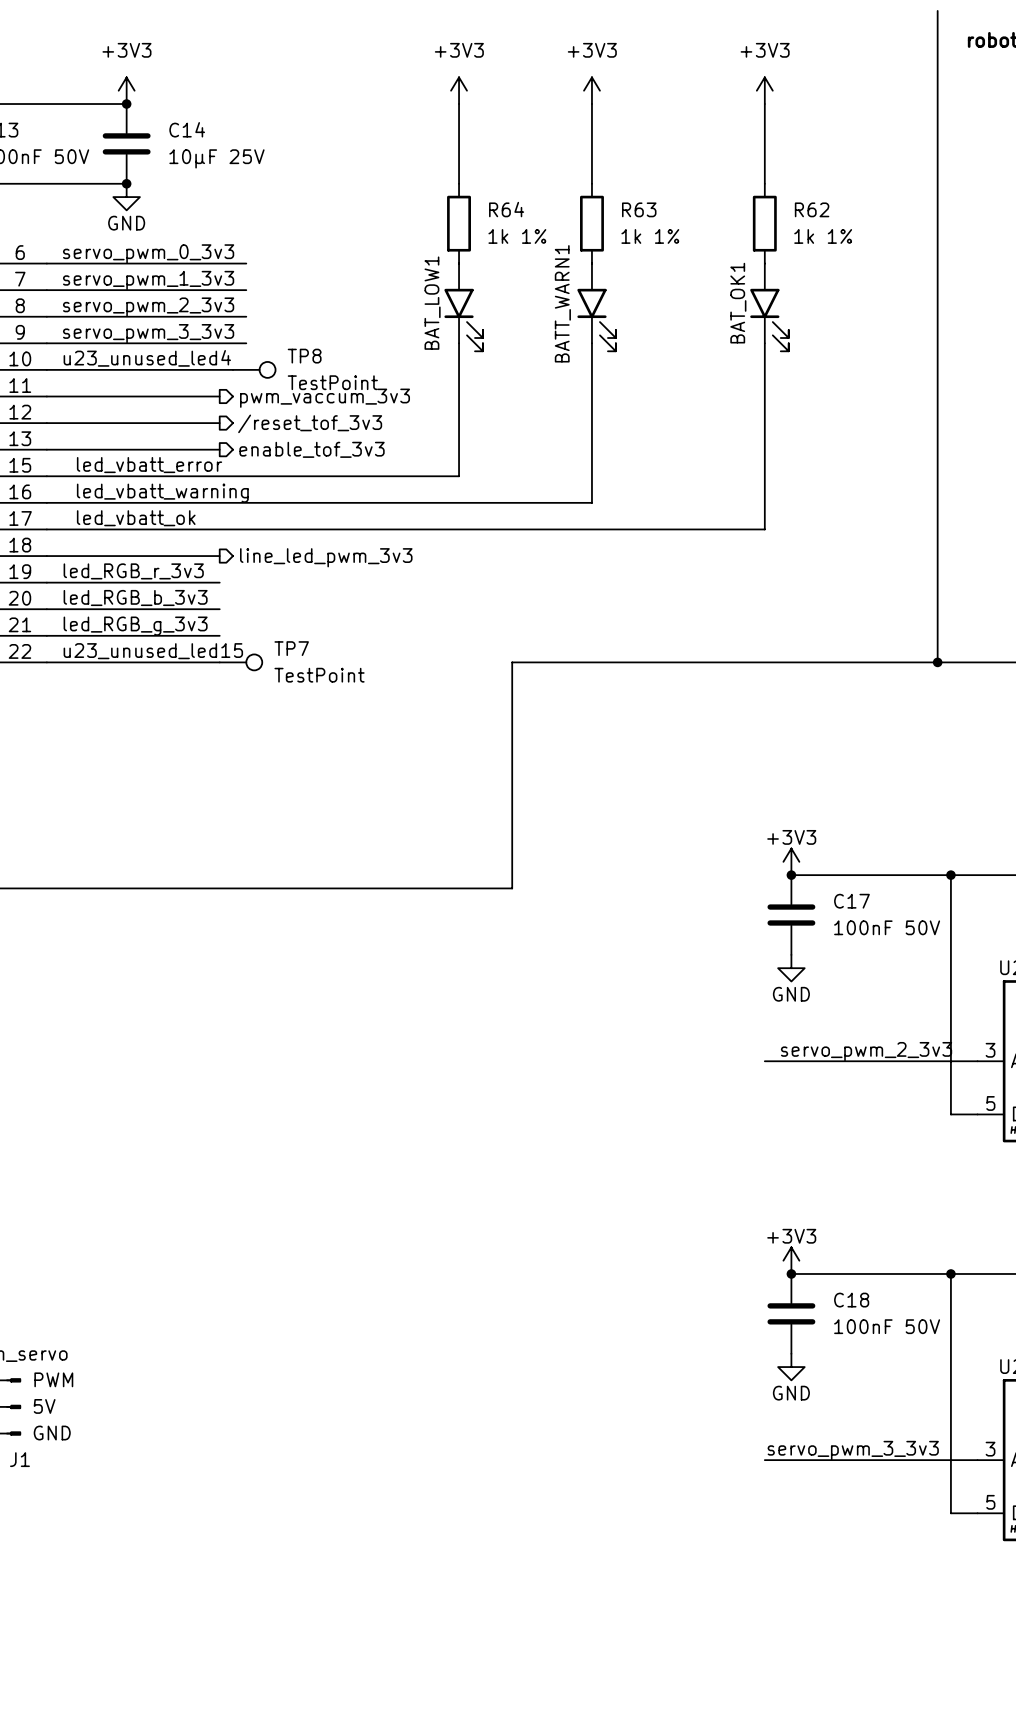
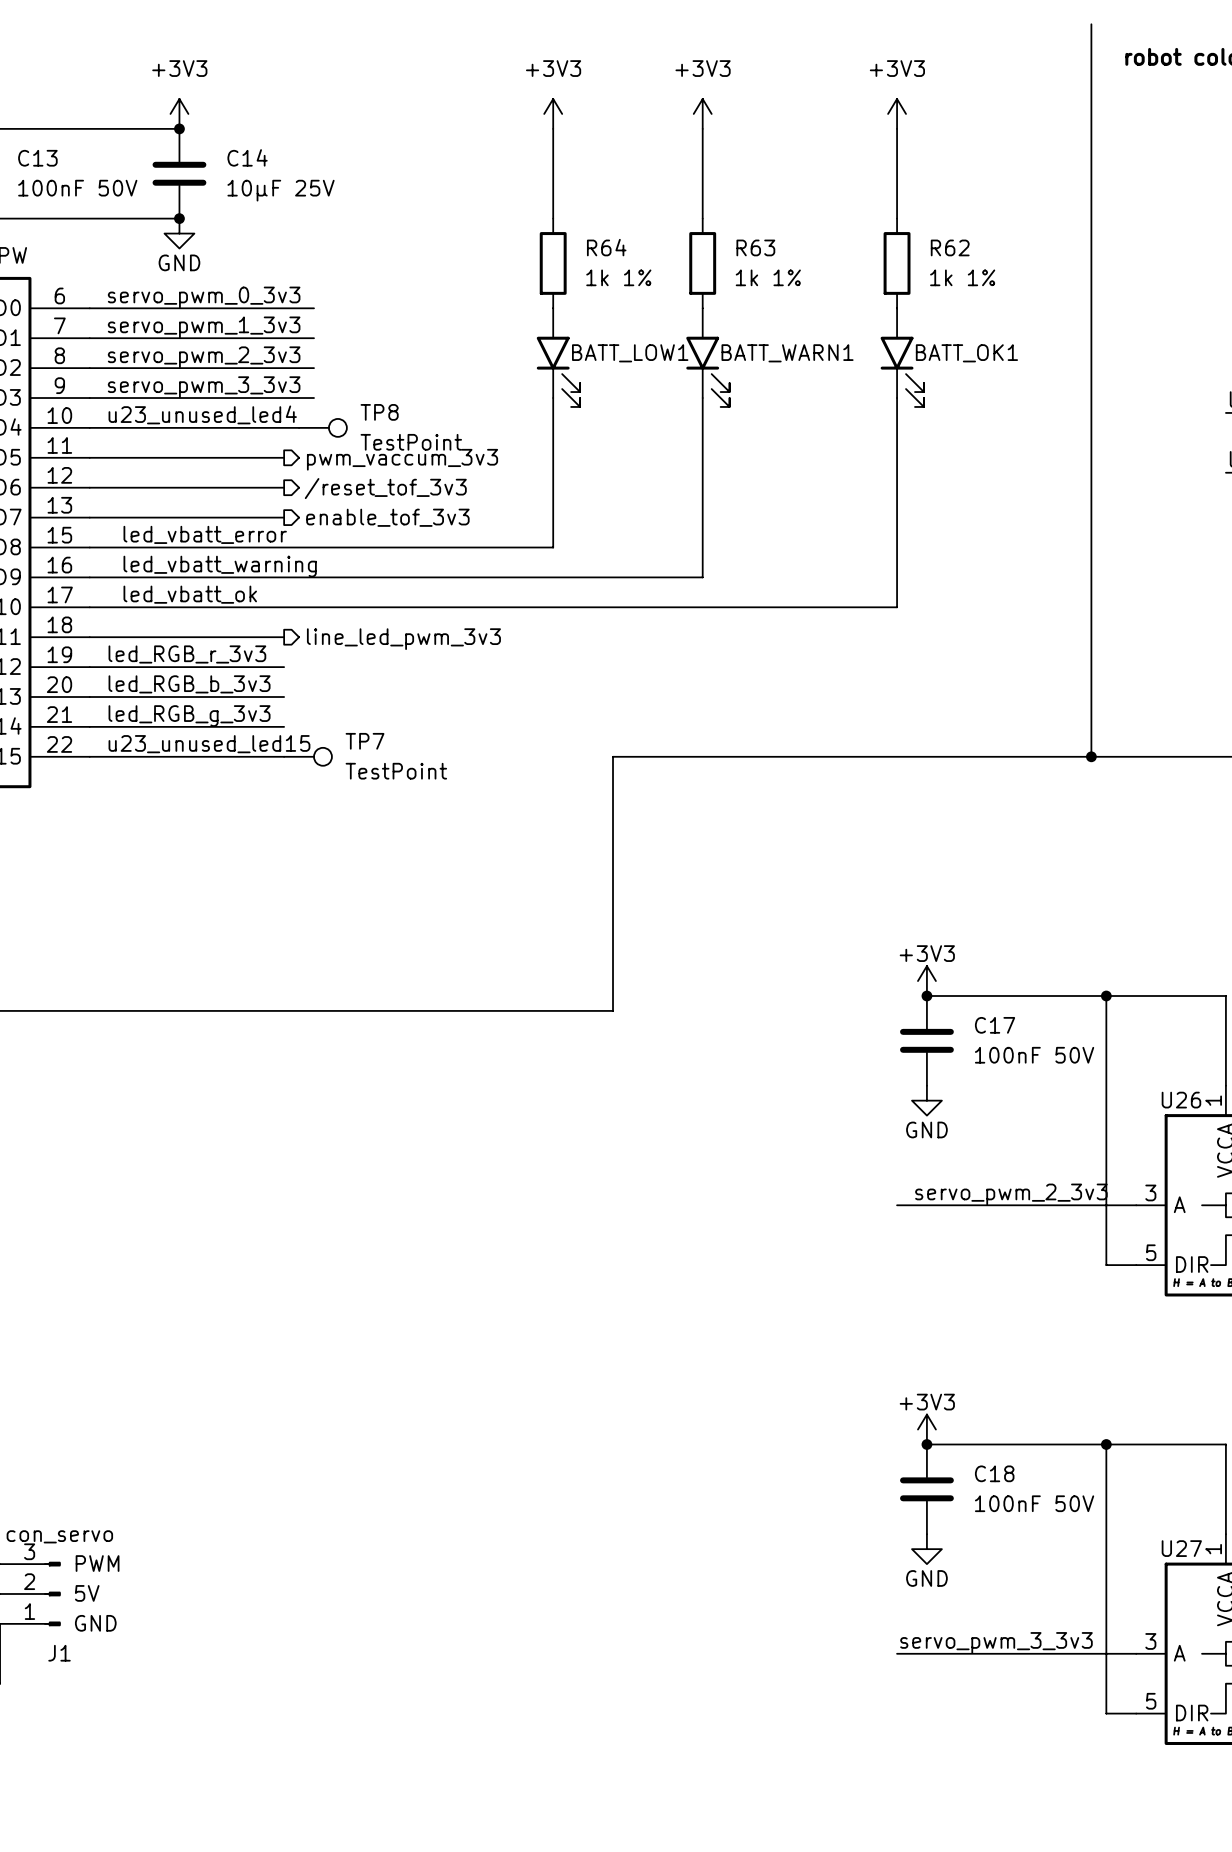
BAT_LOW1 name: BAT_LOW1 (432, 303) -> BATT_LOW1 (630, 353)
BATT_WARN1 name rotation: 0° (562, 303) -> 90° clockwise (787, 353)
BAT_OK1 name: BAT_OK1 (738, 303) -> BATT_OK1 (966, 353)

